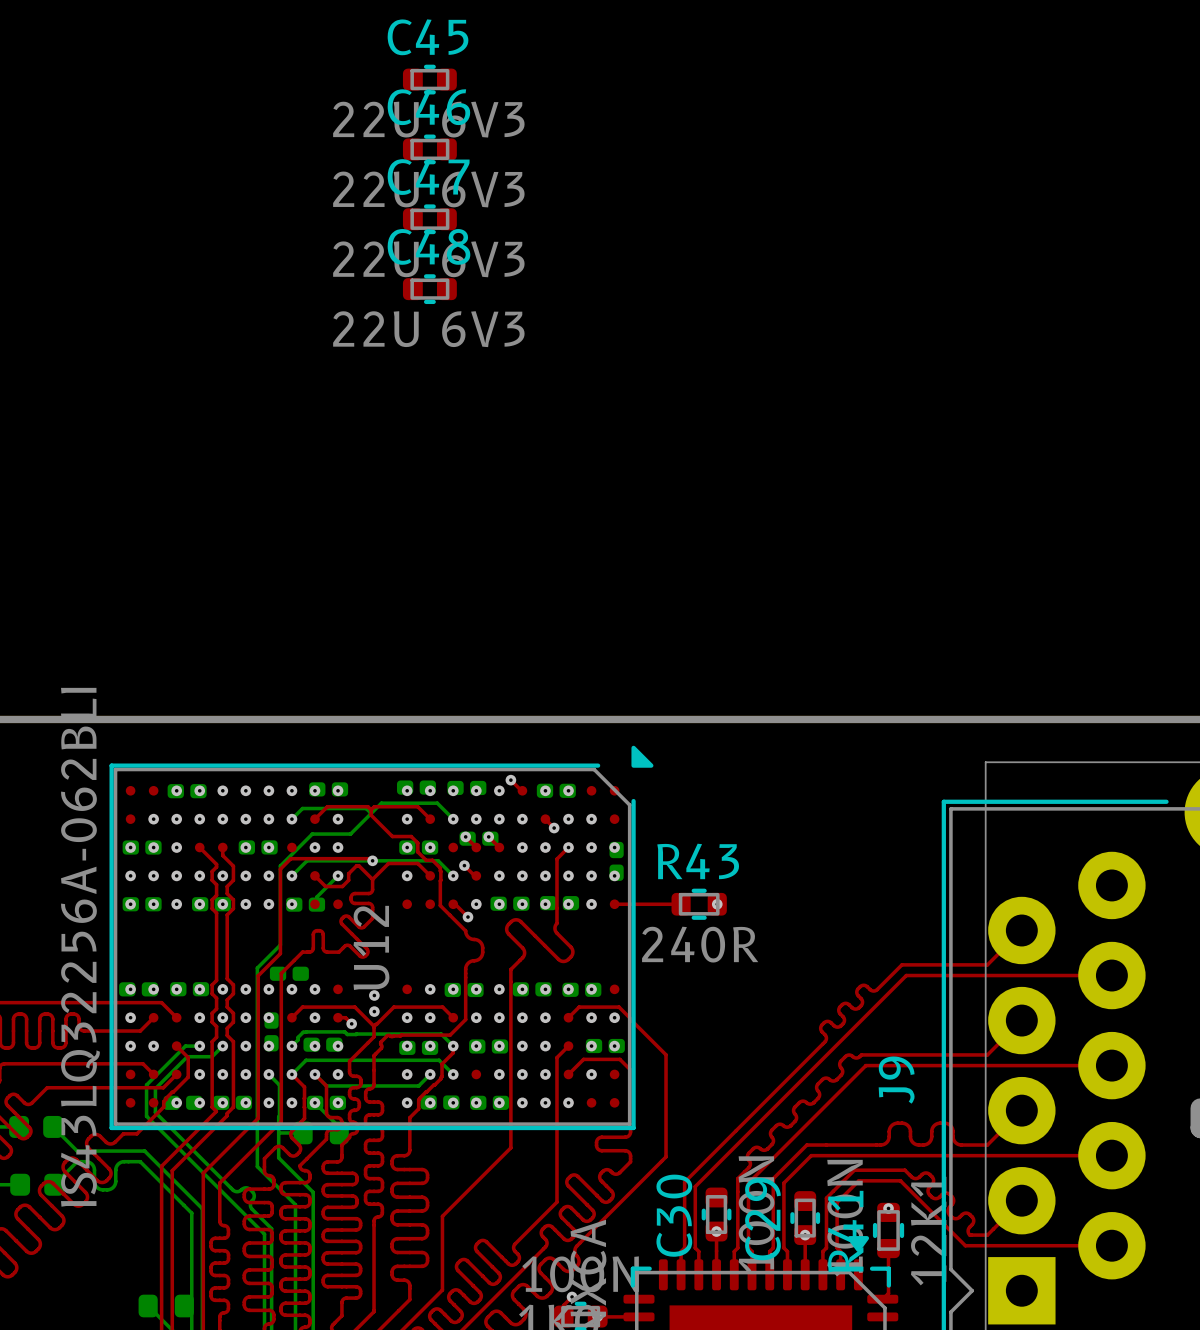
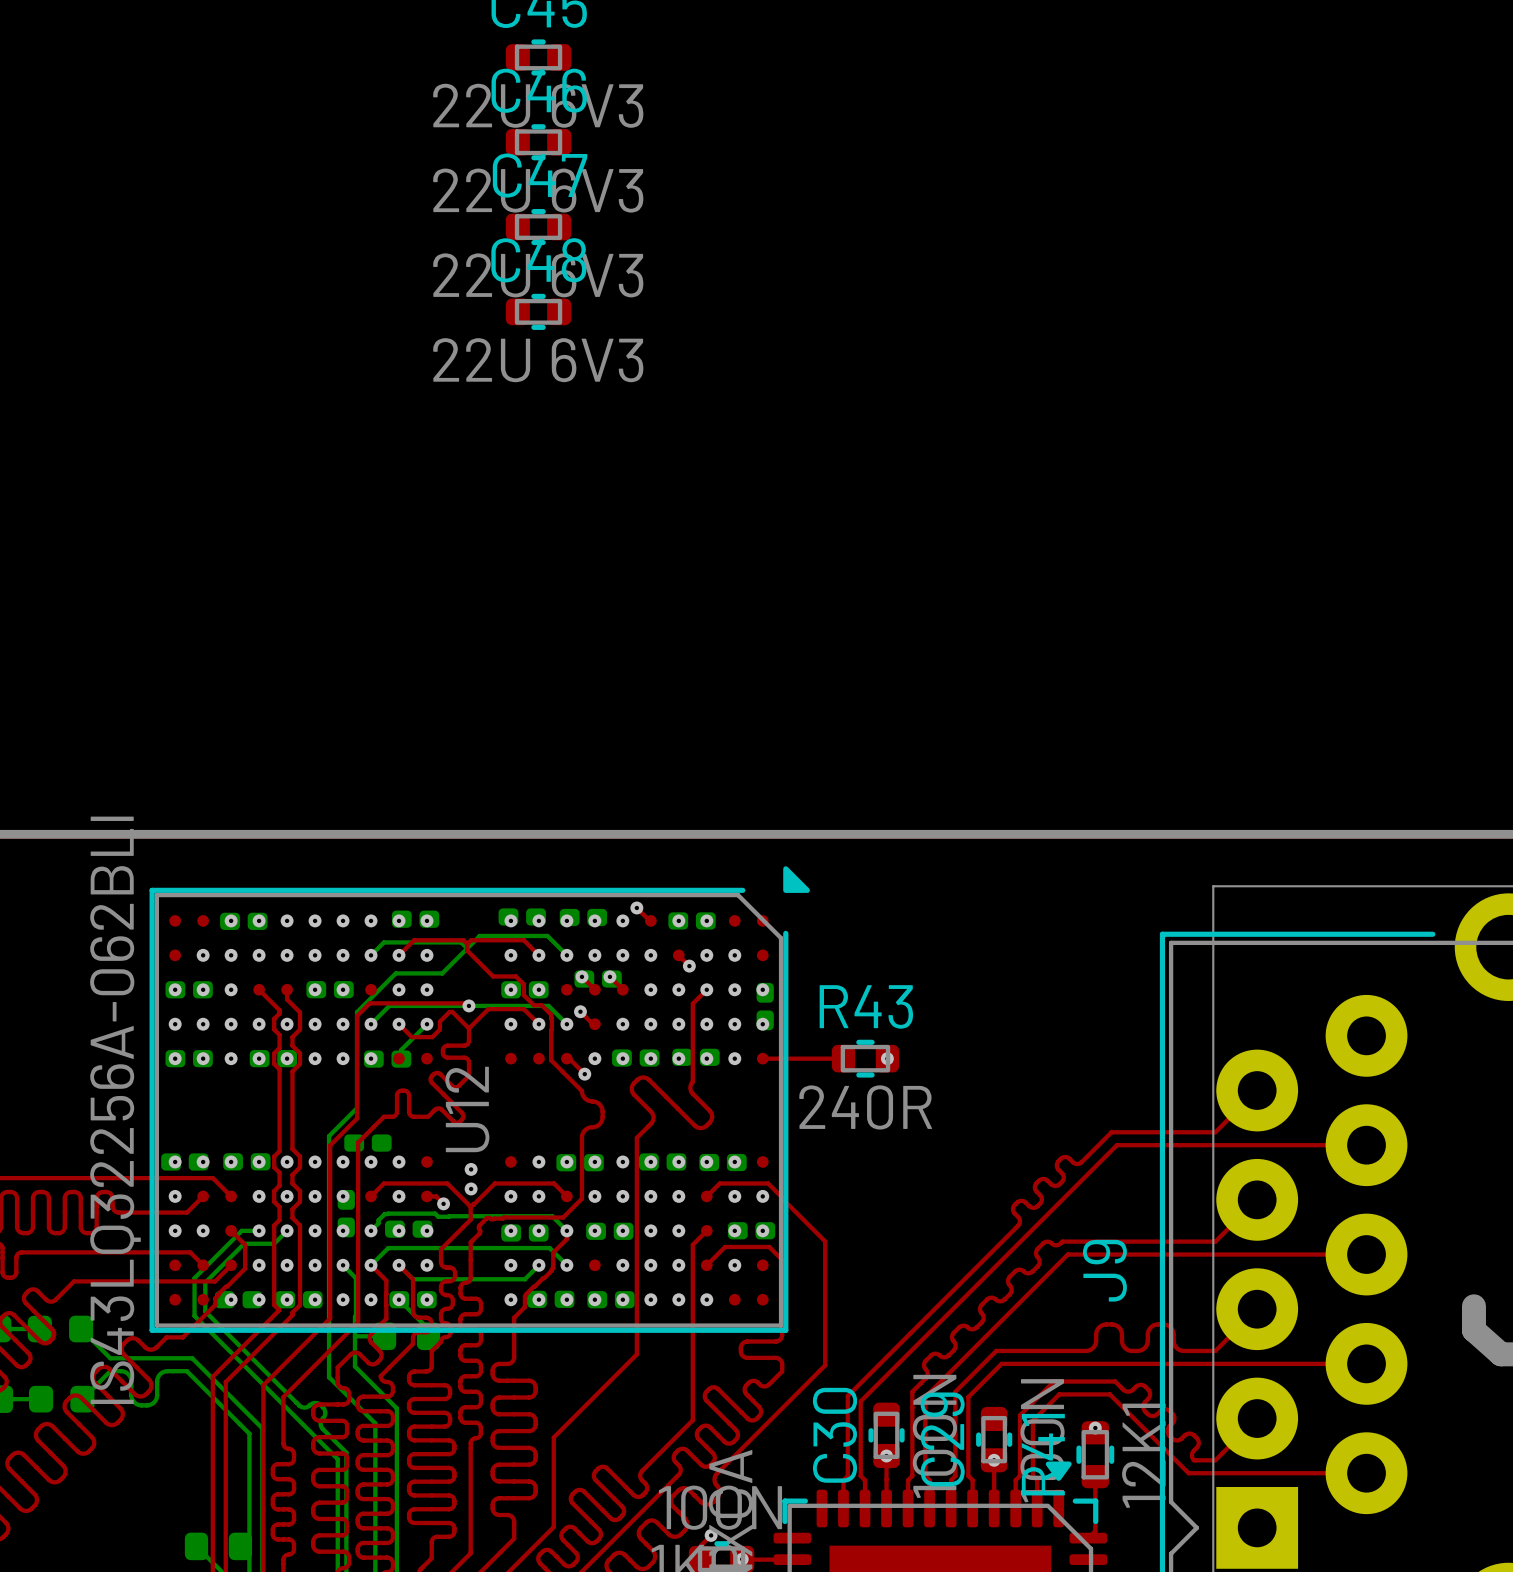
via: none -> (399, 955)
via: none -> (538, 955)
via: none -> (399, 1024)
via: none -> (538, 1024)

